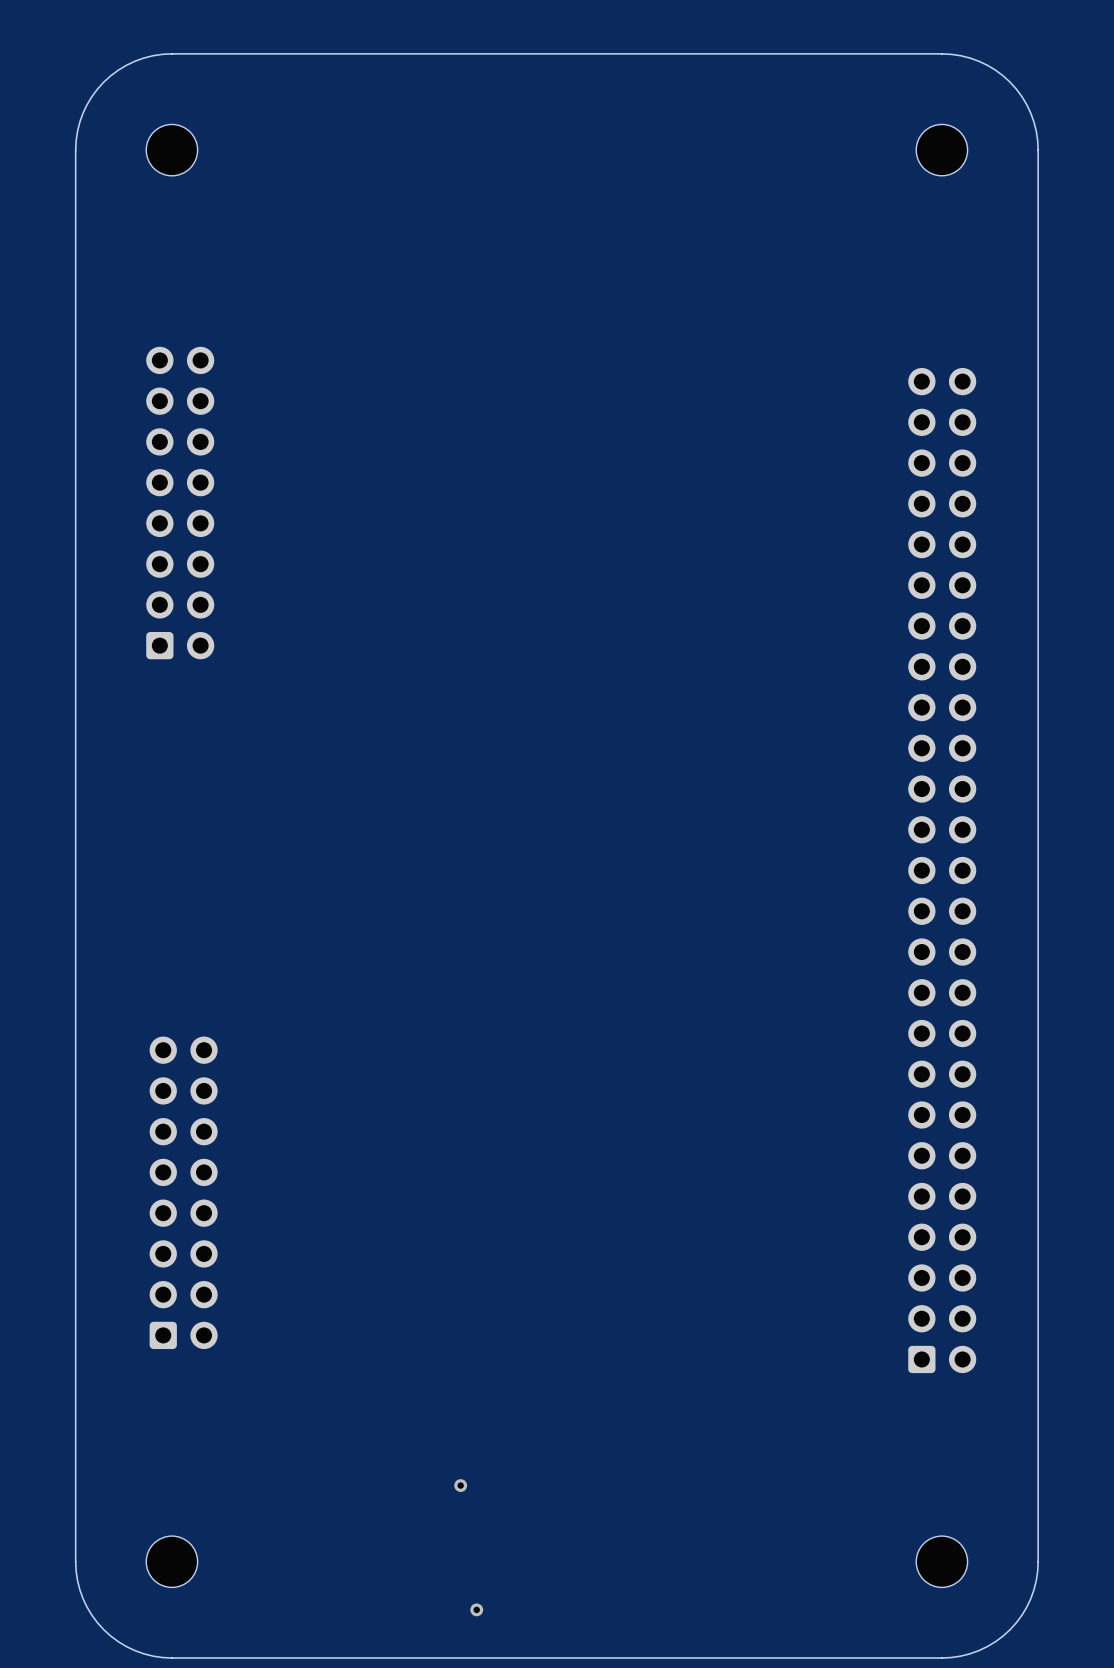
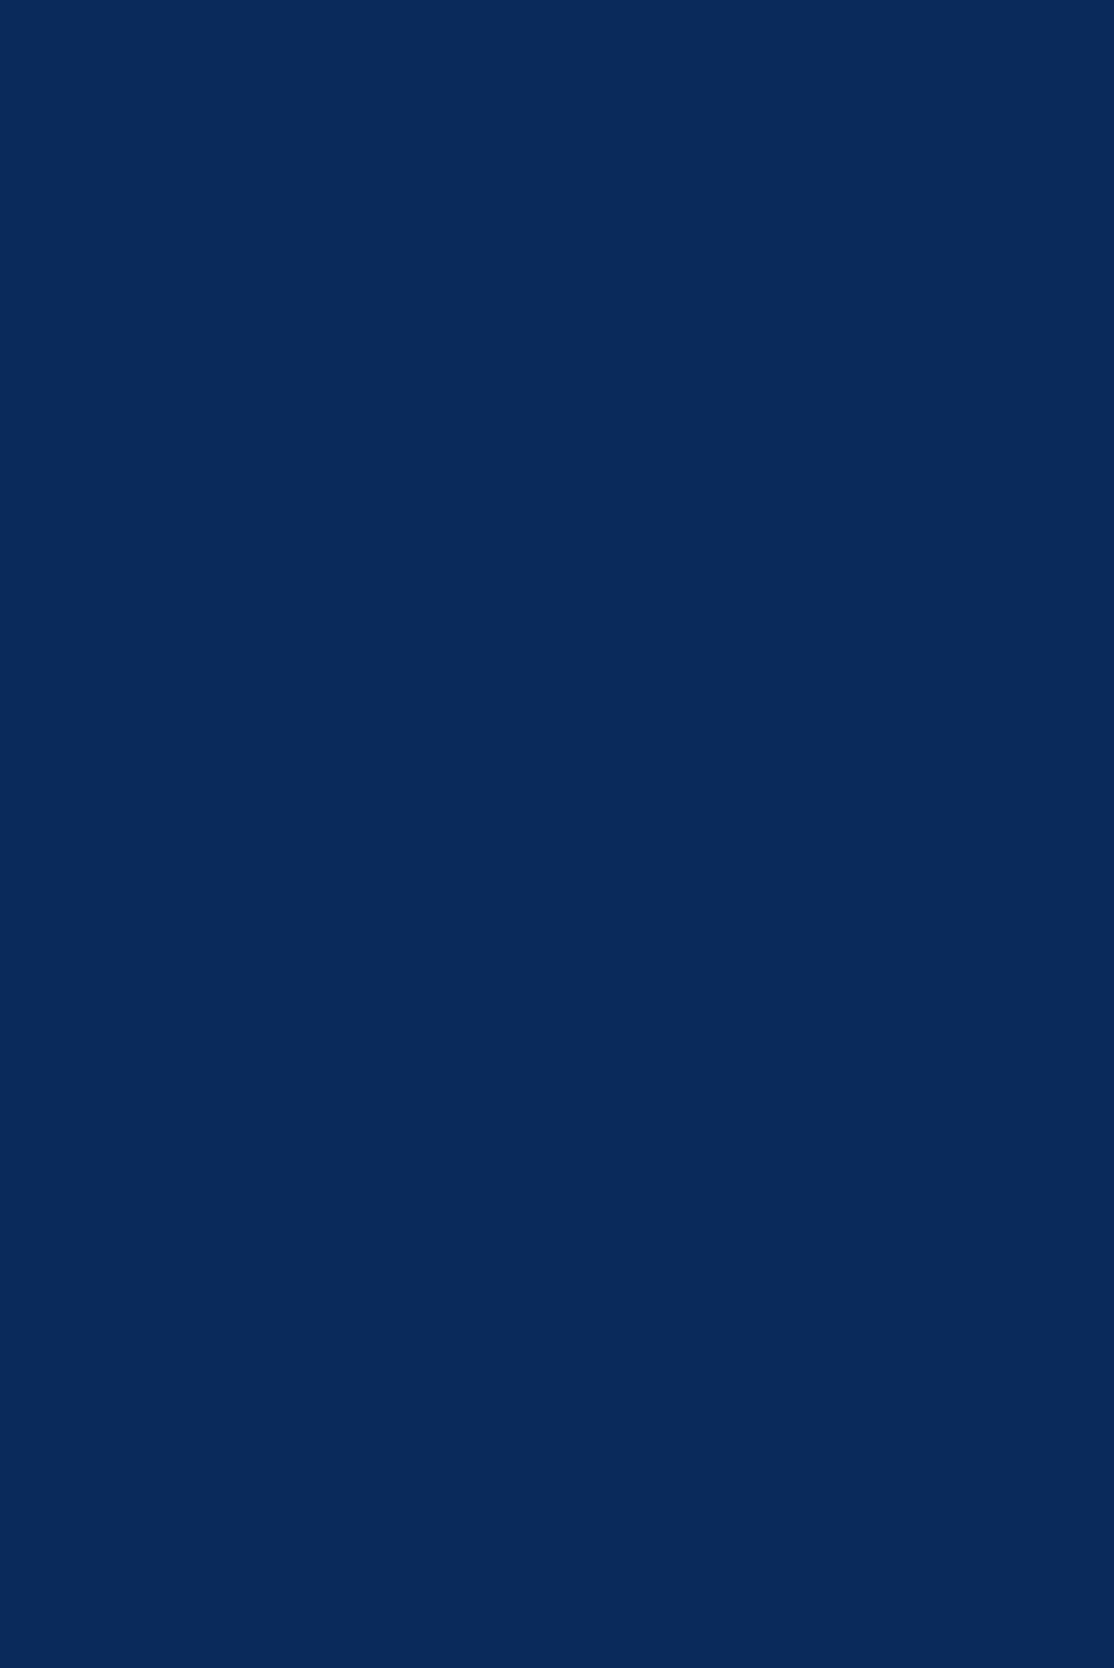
board edge: (941, 53) (162, 54) (143, 58) (118, 70) (97, 89) (87, 104) (79, 122) (75, 150) (75, 1561) (77, 1580) (87, 1607) (103, 1629) (126, 1646) (143, 1653) (171, 1658) (941, 1658) (969, 1653) (995, 1641) (1016, 1622) (1026, 1607) (1034, 1589) (1038, 1561) (1037, 140) (1034, 122) (1026, 104) (1016, 89) (1002, 75) (978, 61) (960, 55) (941, 53) -> none
part: (171, 150) -> none
part: (941, 150) -> none
part: (180, 503) -> none
part: (942, 870) -> none
part: (183, 1192) -> none
via: (460, 1485) -> none
part: (171, 1561) -> none
part: (941, 1561) -> none
via: (476, 1609) -> none

